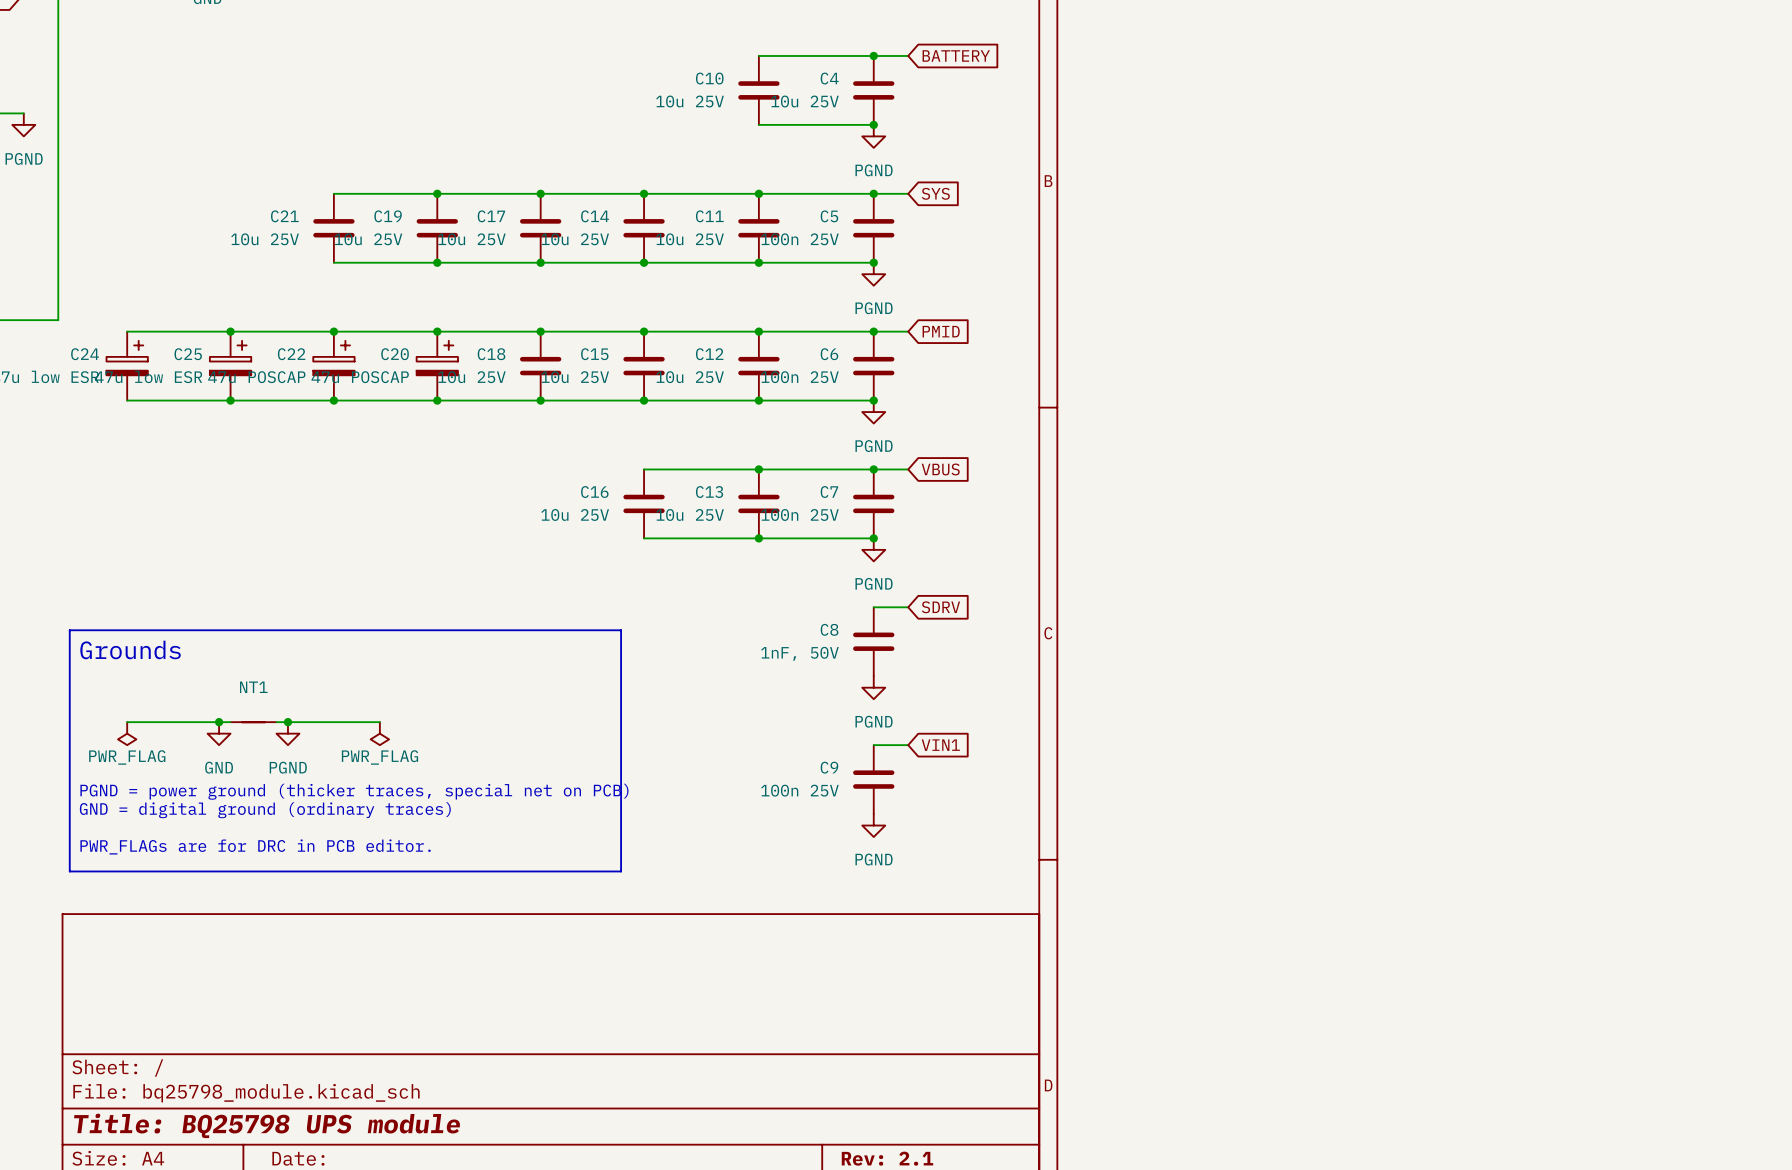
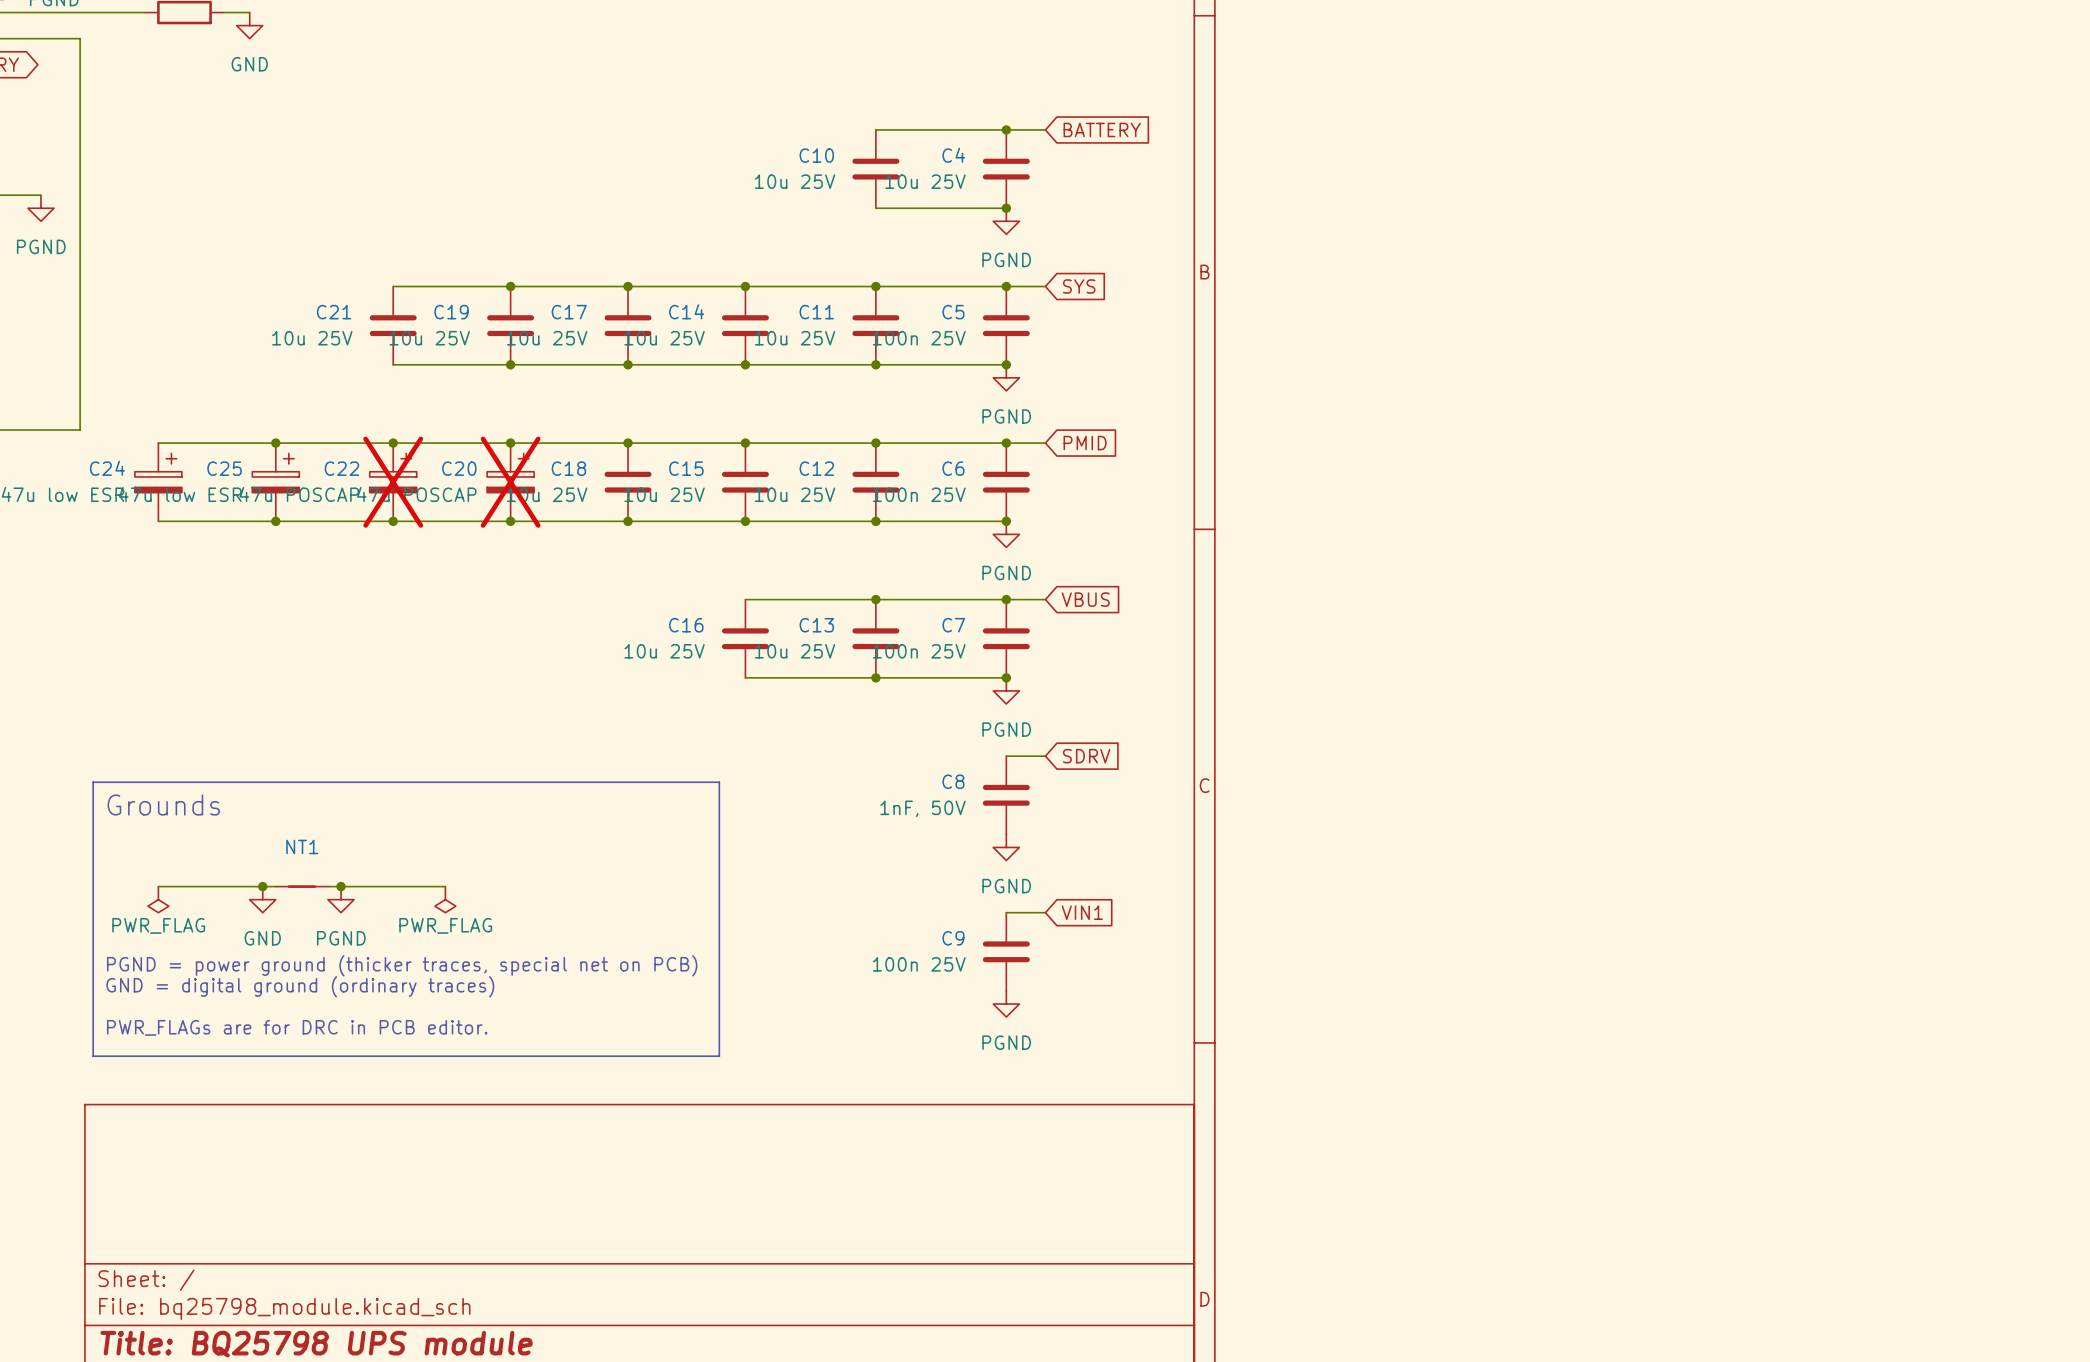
C22 do-not-place cross: none -> (393, 482)
C20 do-not-place cross: none -> (510, 482)

